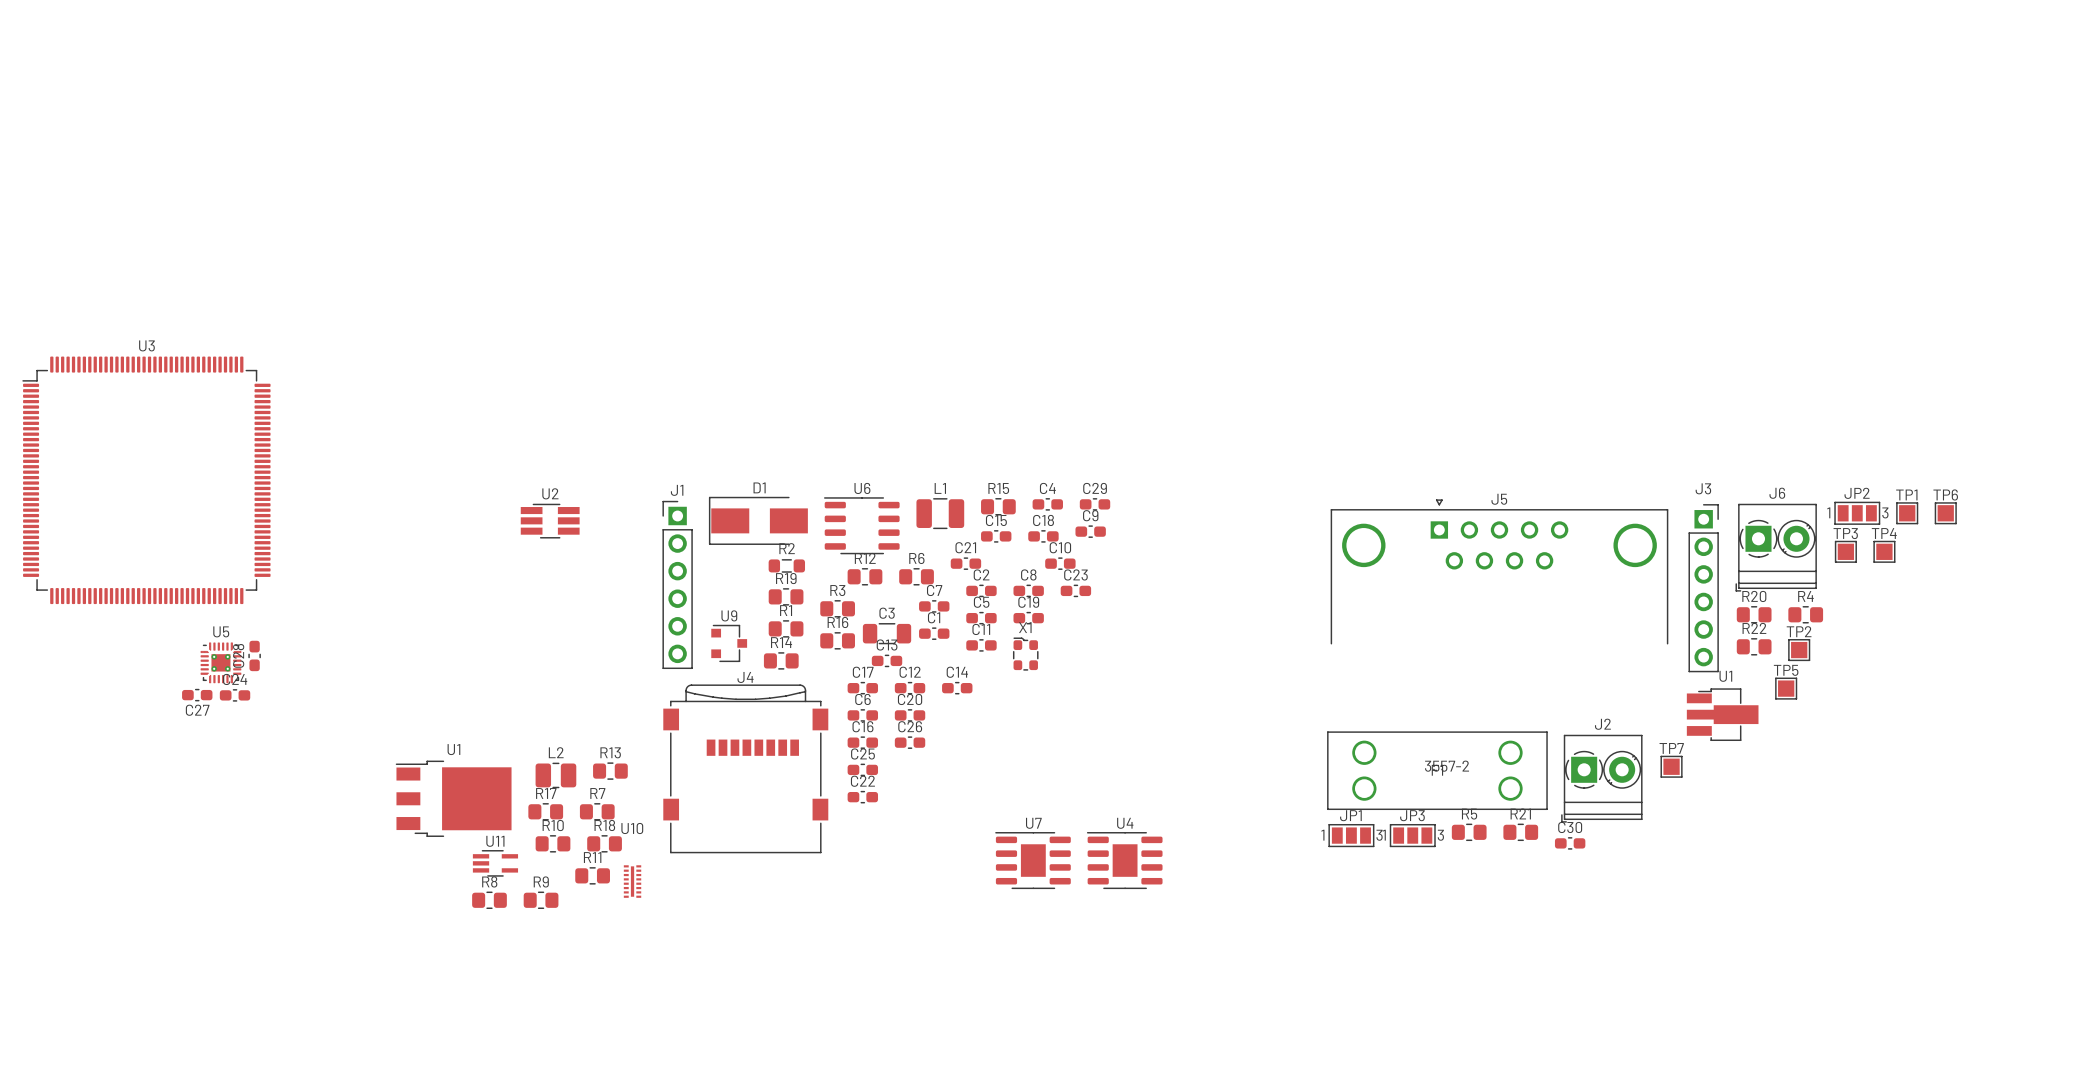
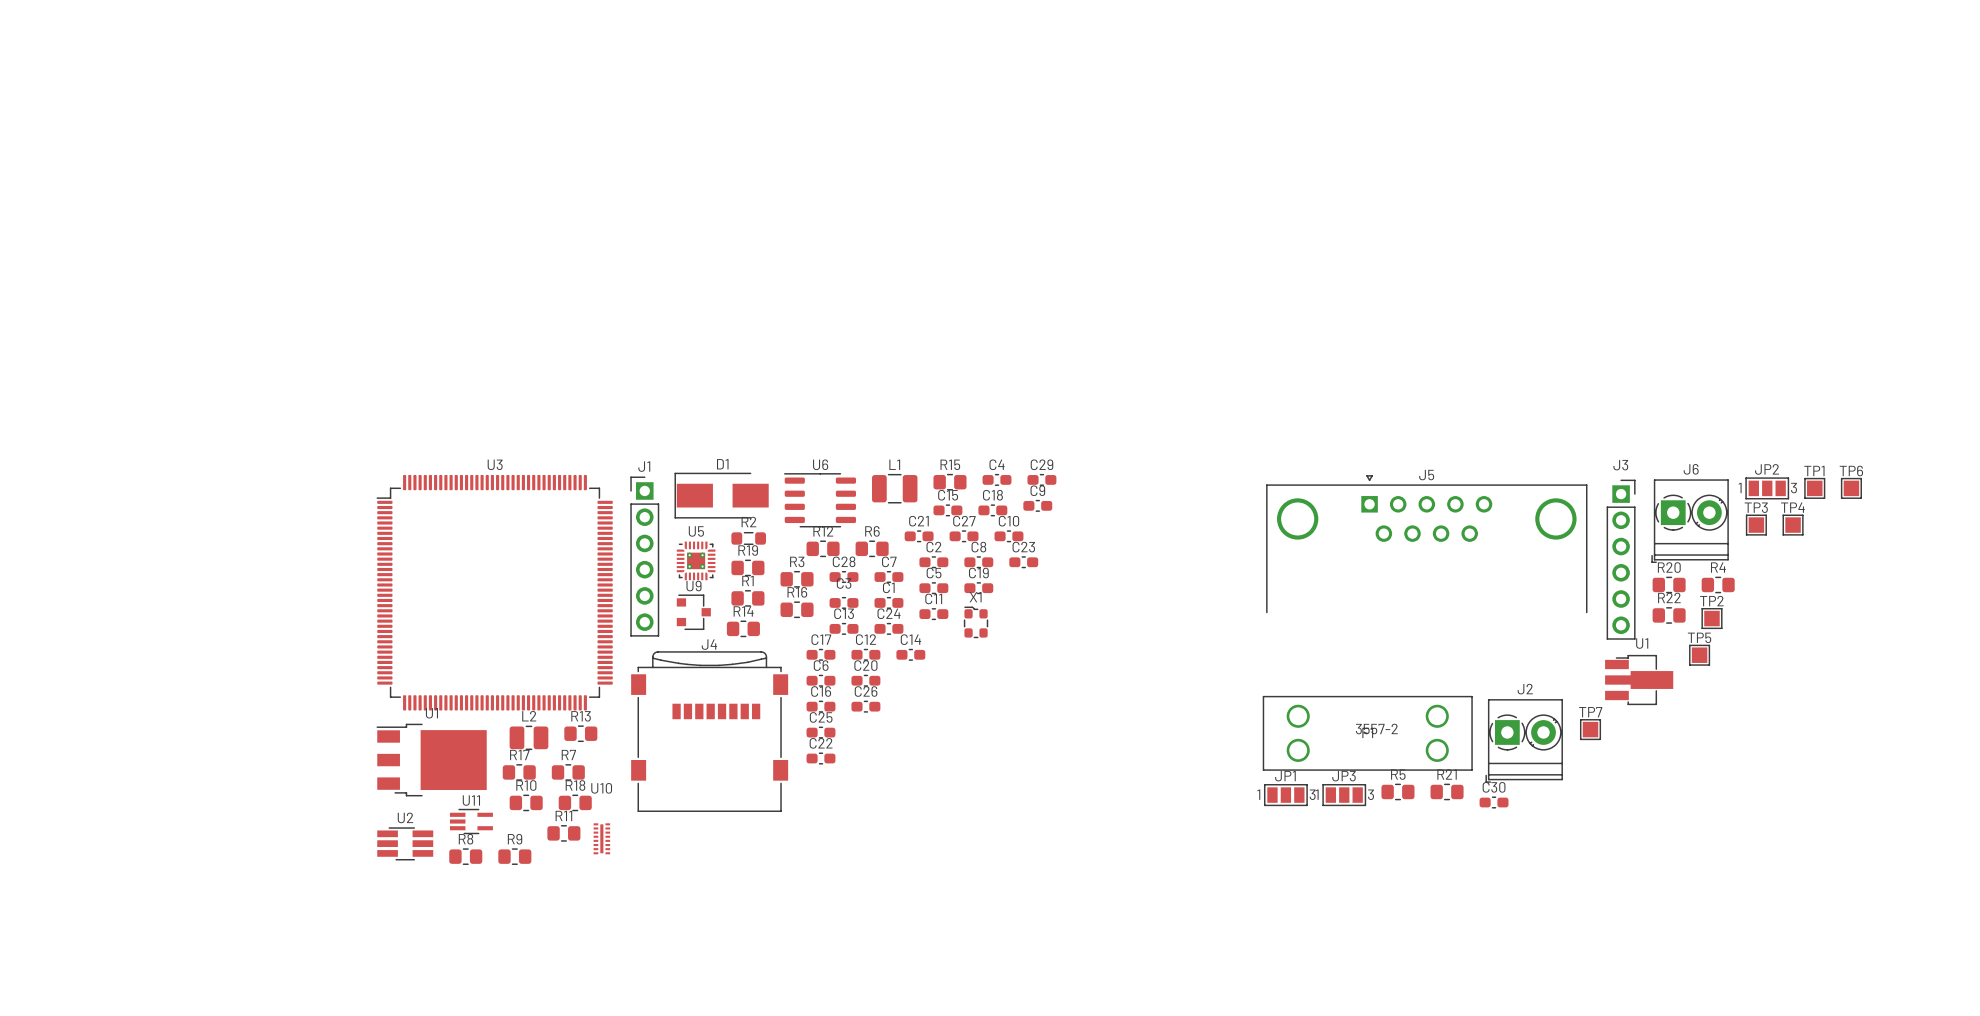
U3 position: (146, 480) -> (494, 592)
U2 position: (550, 521) -> (405, 843)
C3 footprint: [862, 623, 912, 645] -> [829, 597, 859, 609]
C28 rotation: 0° (254, 655) -> 90° clockwise (844, 577)
C28 position: (254, 655) -> (844, 577)
U5 position: (220, 662) -> (696, 560)
C27 position: (197, 695) -> (964, 536)
C24 position: (235, 695) -> (888, 628)
C27 name position: C27 (197, 710) -> C27 (964, 521)
U7: (1033, 860) -> none
U4: (1124, 860) -> none

